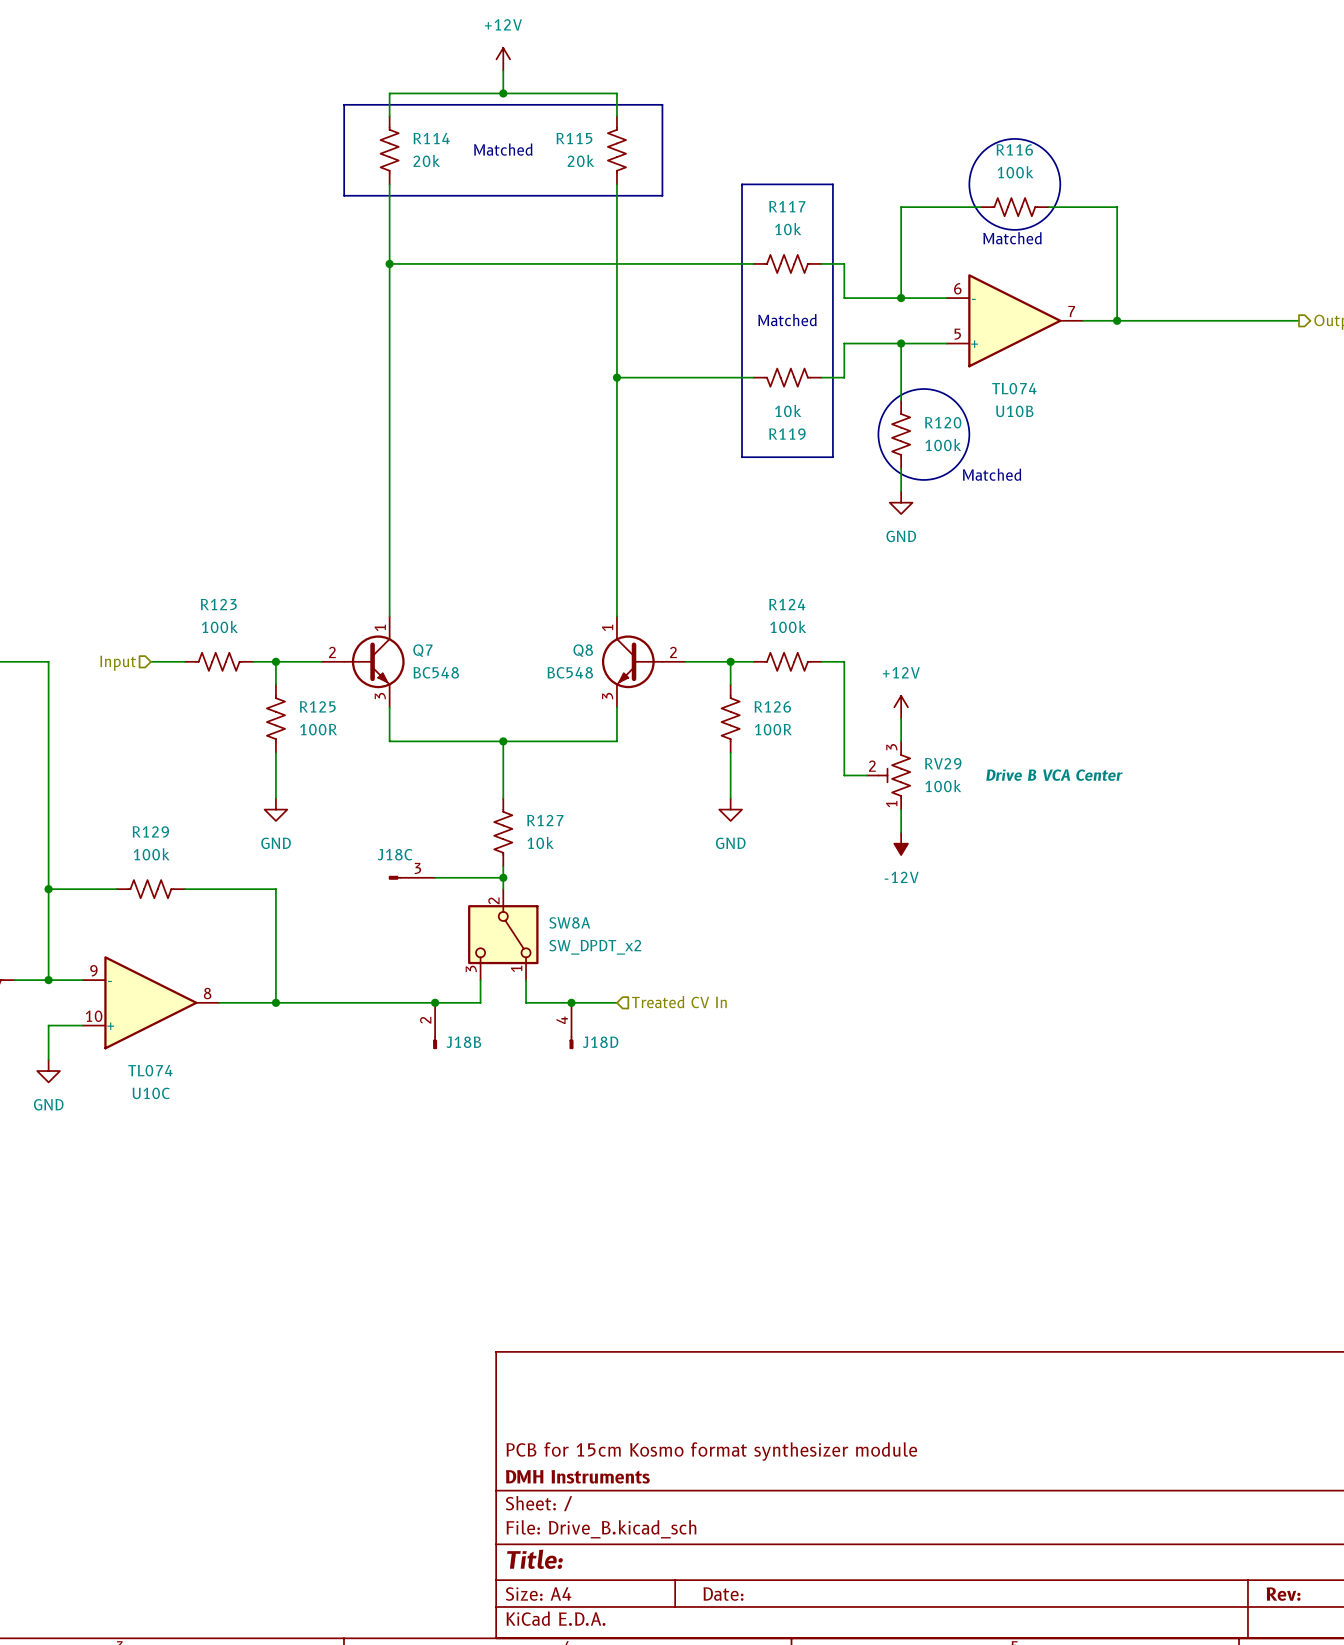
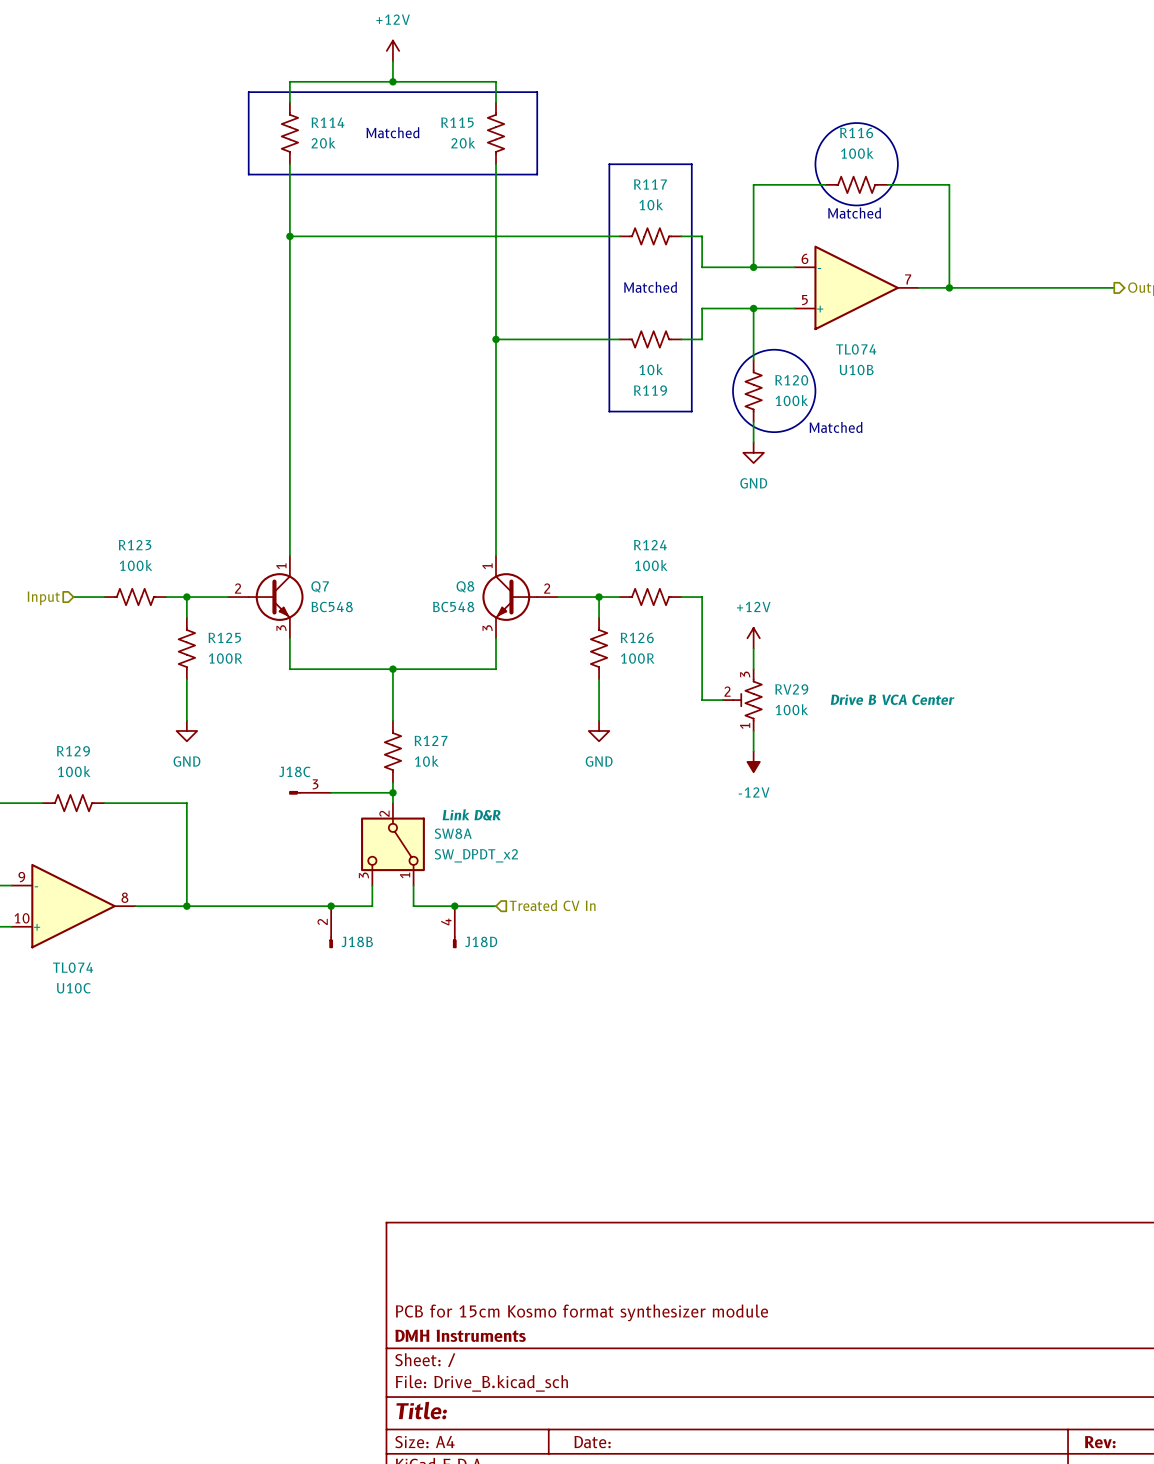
SW8A text: none -> Link D&R (471, 814)

